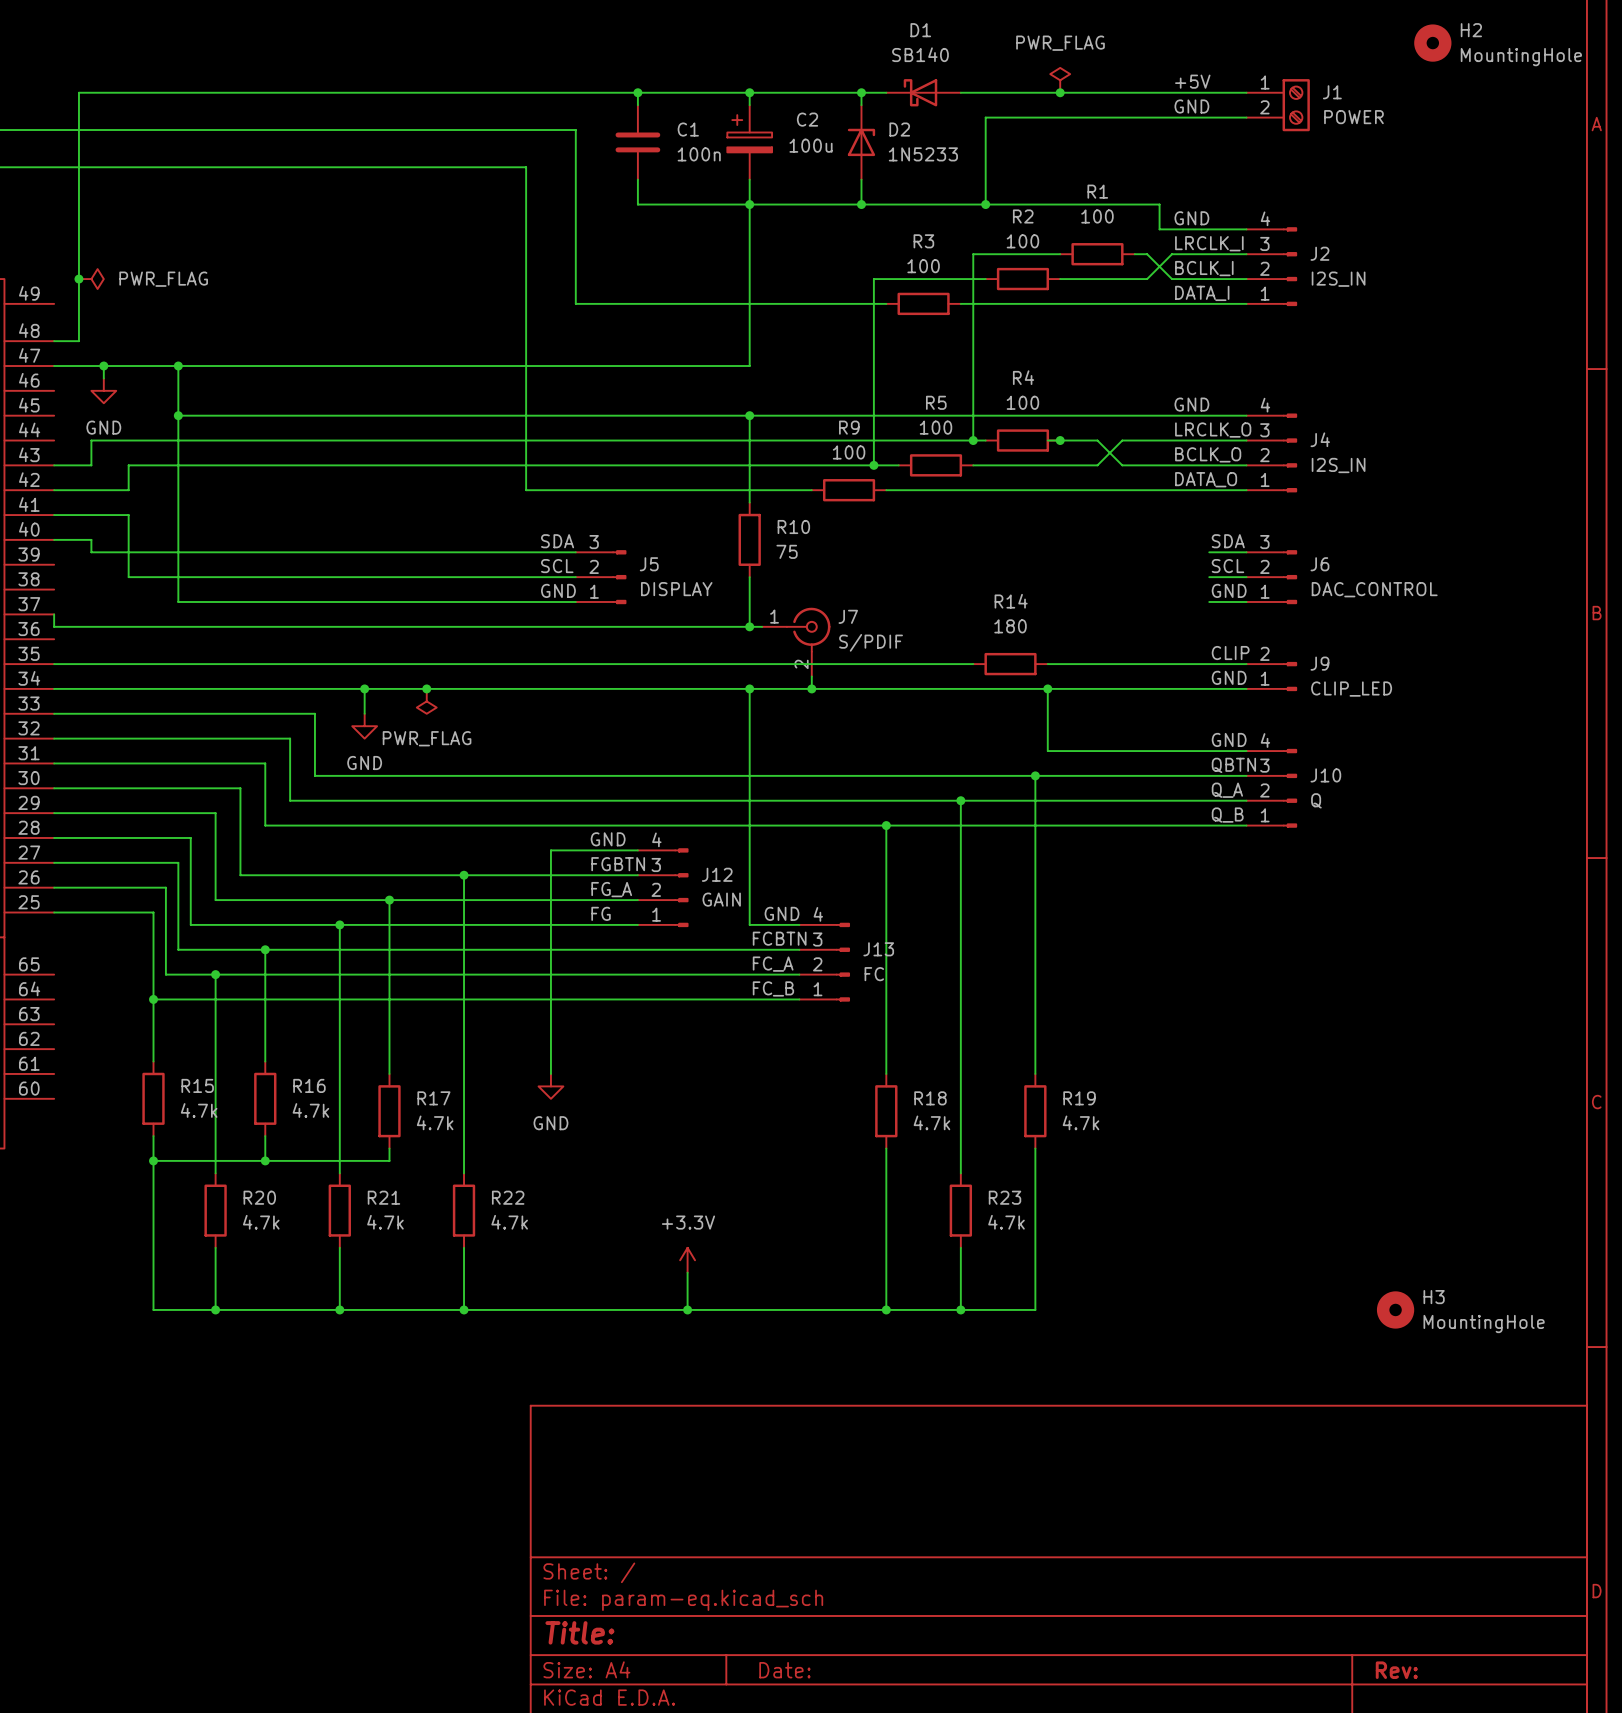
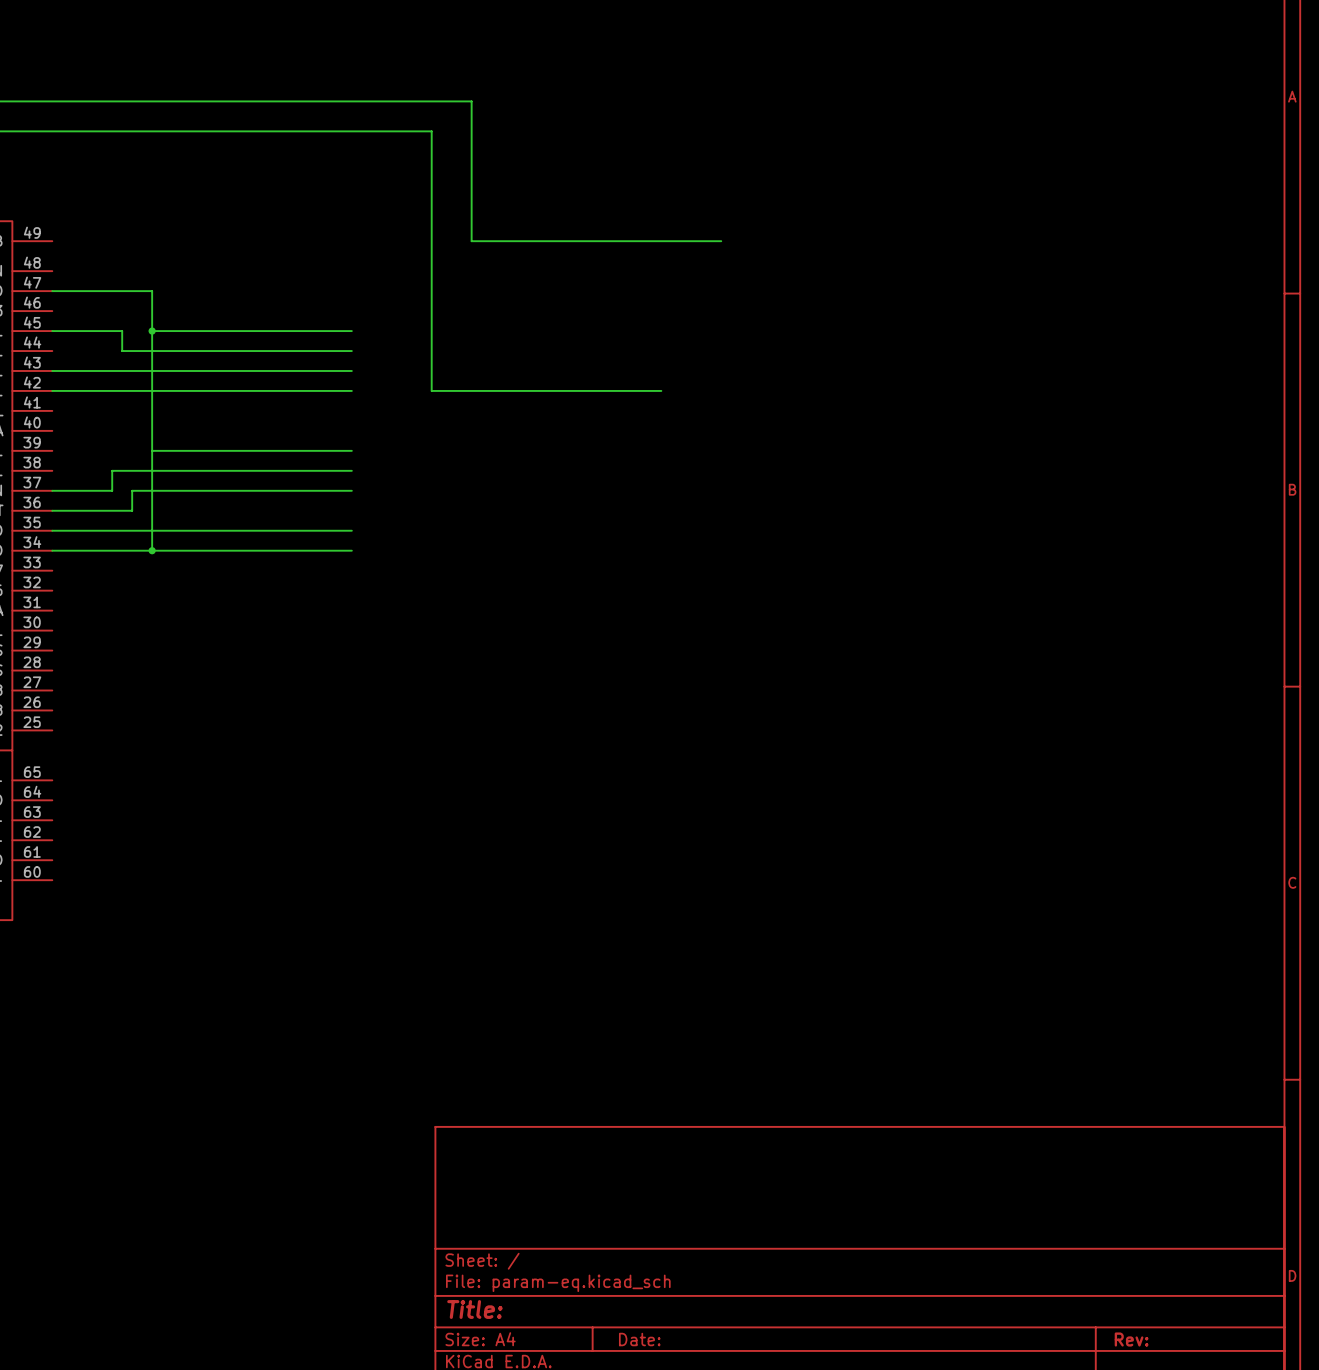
H2: MountingHole (1432, 43) -> none
power symbol: PWR_FLAG (1060, 80) -> none
label: +5V (1192, 81) -> none
wire: (637, 92) (637, 105) -> none
junction: (637, 92) -> none
wire: (749, 92) (749, 105) -> none
junction: (749, 92) -> none
wire: (861, 92) (861, 105) -> none
junction: (861, 92) -> none
wire: (886, 92) (78, 92) (78, 341) (54, 341) -> none
D1: SB140 (923, 92) -> none
wire: (960, 92) (1246, 92) -> none
junction: (1060, 92) -> none
J1: POWER (1278, 105) -> none
label: GND (1191, 106) -> none
wire: (1246, 117) (985, 117) (985, 204) -> none
C1: 100n (637, 142) -> none
C2: 100u (749, 142) -> none
D2: 1N5233 (861, 142) -> none
wire: (637, 179) (637, 204) (1159, 204) (1159, 229) (1246, 229) -> none
wire: (749, 179) (749, 366) (178, 366) -> none
wire: (861, 179) (861, 204) -> none
junction: (749, 204) -> none
junction: (861, 204) -> none
junction: (985, 204) -> none
label: GND (1191, 218) -> none
label: LRCLK_I (1209, 243) -> none
wire: (1060, 254) (973, 254) (973, 440) -> none
R1: 100 (1097, 254) -> none
wire: (1134, 254) (1147, 254) (1171, 279) (1246, 279) -> none
wire: (1246, 254) (1171, 254) (1147, 279) (1060, 279) -> none
J2: I2S_IN (1271, 266) -> none
label: BCLK_I (1204, 268) -> none
junction: (78, 279) -> none
power symbol: PWR_FLAG (91, 279) -> none
wire: (985, 279) (873, 279) (873, 465) -> none
R2: 100 (1022, 279) -> none
label: DATA_I (1202, 293) -> none
R3: 100 (923, 303) -> none
wire: (960, 303) (1246, 303) -> none
wire: (103, 366) (103, 378) -> none
junction: (103, 366) -> none
junction: (178, 366) -> none
power symbol: GND (103, 390) -> none
label: GND (1191, 404) -> none
wire: none -> (52, 331) (122, 331) (122, 351)
wire: (426, 415) (1246, 415) -> none
wire: (749, 415) (749, 502) -> none
junction: (749, 415) -> none
label: LRCLK_O (1213, 430) -> none
wire: (141, 440) (91, 440) (91, 465) -> (112, 370) (82, 370)
wire: (426, 440) (985, 440) -> none
junction: (973, 440) -> none
R4: 100 (1022, 440) -> none
wire: (1047, 440) (1097, 440) (1122, 465) (1246, 465) -> none
junction: (1060, 440) -> none
wire: (1246, 440) (1122, 440) (1097, 465) (973, 465) -> none
J4: I2S_IN (1271, 452) -> none
label: BCLK_O (1208, 454) -> none
wire: (128, 465) (128, 490) -> (351, 390) (112, 390)
wire: (426, 465) (898, 465) -> none
junction: (873, 465) -> none
R5: 100 (936, 465) -> none
label: DATA_O (1206, 479) -> none
R9: 100 (849, 490) -> none
wire: (886, 490) (1246, 490) -> none
wire: (54, 515) (128, 515) (128, 577) (575, 577) -> none
wire: (54, 539) (91, 539) (91, 552) (575, 552) -> none
R10: 75 (749, 539) -> none
label: SDA (557, 541) -> none
label: SDA (1228, 541) -> none
wire: (1209, 552) (1246, 552) -> none
wire: none -> (152, 450) (351, 450)
label: SCL (557, 566) -> none
label: SCL (1227, 566) -> none
J5: DISPLAY (601, 577) -> none
wire: (749, 577) (749, 626) -> none
wire: (1209, 577) (1246, 577) -> none
J6: DAC_CONTROL (1271, 577) -> none
label: GND (558, 590) -> none
label: GND (1229, 590) -> none
wire: (178, 601) (575, 601) -> (152, 480) (152, 550)
wire: (1209, 601) (1246, 601) -> none
wire: (54, 614) (54, 626) (762, 626) -> (52, 490) (112, 490) (112, 470) (351, 470)
wire: none -> (351, 490) (132, 490) (132, 510) (52, 510)
junction: (749, 626) -> none
J7: S/PDIF (796, 642) -> none
label: CLIP (1230, 653) -> none
wire: (426, 664) (973, 664) -> none
R14: 180 (1010, 664) -> none
wire: (1047, 664) (1246, 664) -> none
wire: (811, 676) (811, 688) -> none
J9: CLIP_LED (1271, 676) -> none
label: GND (1229, 677) -> none
junction: none -> (152, 550)
wire: (364, 688) (364, 713) -> none
junction: (364, 688) -> none
wire: (426, 688) (1246, 688) -> none
junction: (426, 688) -> none
wire: (749, 688) (749, 924) (799, 924) -> none
junction: (749, 688) -> none
junction: (811, 688) -> none
wire: (1047, 688) (1047, 751) (1246, 751) -> none
junction: (1047, 688) -> none
power symbol: PWR_FLAG (426, 701) -> none
wire: (54, 713) (314, 713) (314, 775) (1246, 775) -> none
power symbol: GND (364, 726) -> none
wire: (54, 738) (290, 738) (290, 800) (1246, 800) -> none
label: GND (1229, 739) -> none
wire: (54, 763) (265, 763) (265, 825) (1246, 825) -> none
label: QBTN (1233, 765) -> none
wire: (1035, 775) (1035, 1073) -> none
junction: (1035, 775) -> none
wire: (54, 788) (240, 788) (240, 875) (637, 875) -> none
J10: Q (1271, 788) -> none
label: Q_A (1227, 790) -> none
wire: (960, 800) (960, 1173) -> none
junction: (960, 800) -> none
wire: (54, 813) (215, 813) (215, 900) (637, 900) -> none
label: Q_B (1227, 815) -> none
wire: (886, 825) (886, 1073) -> none
junction: (886, 825) -> none
wire: (54, 837) (190, 837) (190, 924) (637, 924) -> none
label: GND (608, 839) -> none
wire: (637, 850) (550, 850) (550, 1073) -> none
wire: (54, 862) (178, 862) (178, 949) (799, 949) -> none
label: FGBTN (618, 864) -> none
wire: (464, 875) (464, 1173) -> none
junction: (464, 875) -> none
wire: (54, 887) (165, 887) (165, 974) (799, 974) -> none
J12: GAIN (663, 887) -> none
label: FG_A (611, 889) -> none
wire: (389, 900) (389, 1073) -> none
junction: (389, 900) -> none
wire: (54, 912) (153, 912) (153, 1061) -> none
label: FG (601, 913) -> none
label: GND (782, 913) -> none
wire: (339, 924) (339, 1173) -> none
junction: (339, 924) -> none
label: FCBTN (779, 938) -> none
wire: (265, 949) (265, 1061) -> none
junction: (265, 949) -> none
J13: FC (824, 962) -> none
label: FC_A (773, 964) -> none
wire: (215, 974) (215, 1173) -> none
junction: (215, 974) -> none
label: FC_B (773, 988) -> none
wire: (153, 999) (799, 999) -> none
junction: (153, 999) -> none
power symbol: GND (550, 1086) -> none
R15: 4.7k (153, 1098) -> none
R16: 4.7k (265, 1098) -> none
R17: 4.7k (389, 1111) -> none
R18: 4.7k (886, 1111) -> none
R19: 4.7k (1035, 1111) -> none
wire: (153, 1136) (153, 1309) (1035, 1309) (1035, 1148) -> none
wire: (265, 1136) (265, 1160) -> none
wire: (389, 1148) (389, 1160) (153, 1160) -> none
wire: (886, 1148) (886, 1309) -> none
junction: (153, 1160) -> none
junction: (265, 1160) -> none
R20: 4.7k (215, 1210) -> none
R21: 4.7k (339, 1210) -> none
R22: 4.7k (464, 1210) -> none
R23: 4.7k (960, 1210) -> none
wire: (215, 1247) (215, 1309) -> none
wire: (339, 1247) (339, 1309) -> none
wire: (464, 1247) (464, 1309) -> none
wire: (960, 1247) (960, 1309) -> none
power symbol: +3.3V (687, 1260) -> none
wire: (687, 1272) (687, 1309) -> none
junction: (215, 1309) -> none
junction: (339, 1309) -> none
junction: (464, 1309) -> none
junction: (687, 1309) -> none
junction: (886, 1309) -> none
junction: (960, 1309) -> none
H3: MountingHole (1395, 1309) -> none

